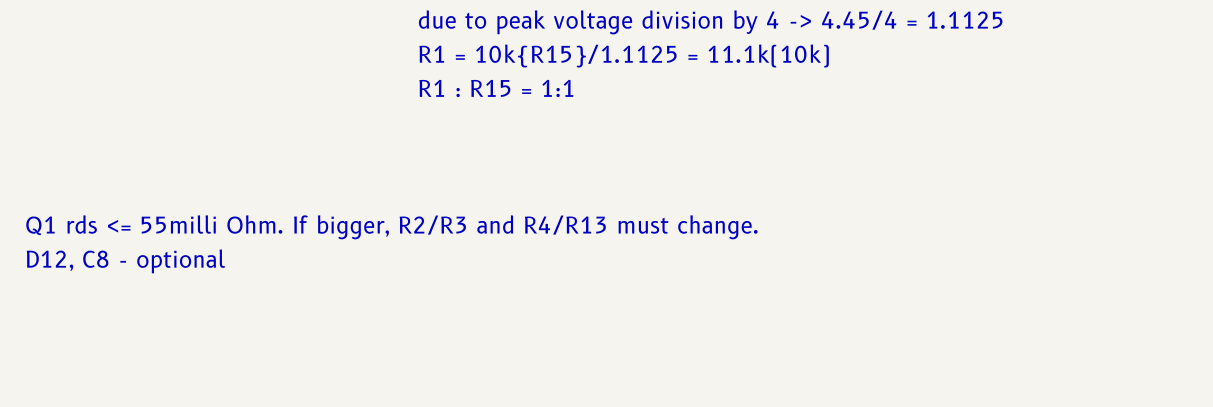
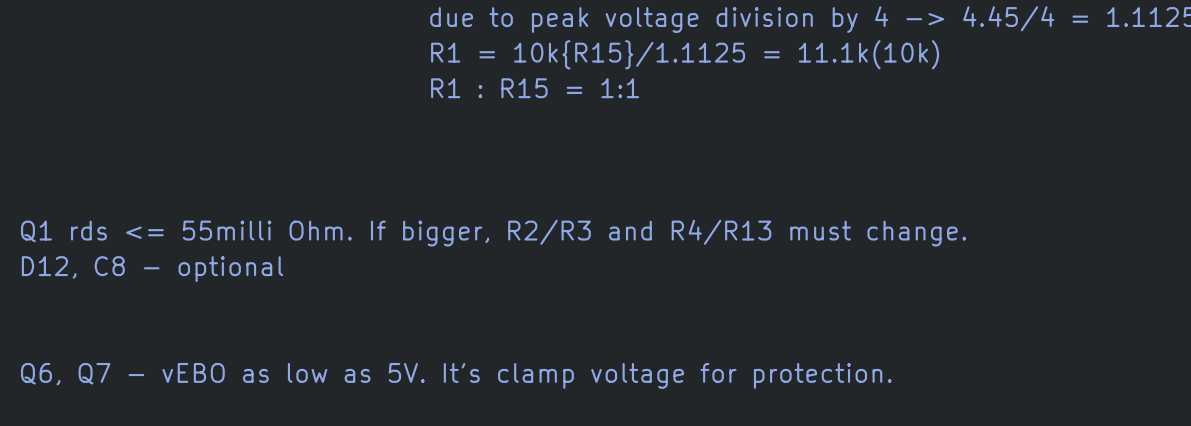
text: none -> Q6, Q7 - vEBO as low as 5V. It's clamp voltage for protection. (456, 375)

